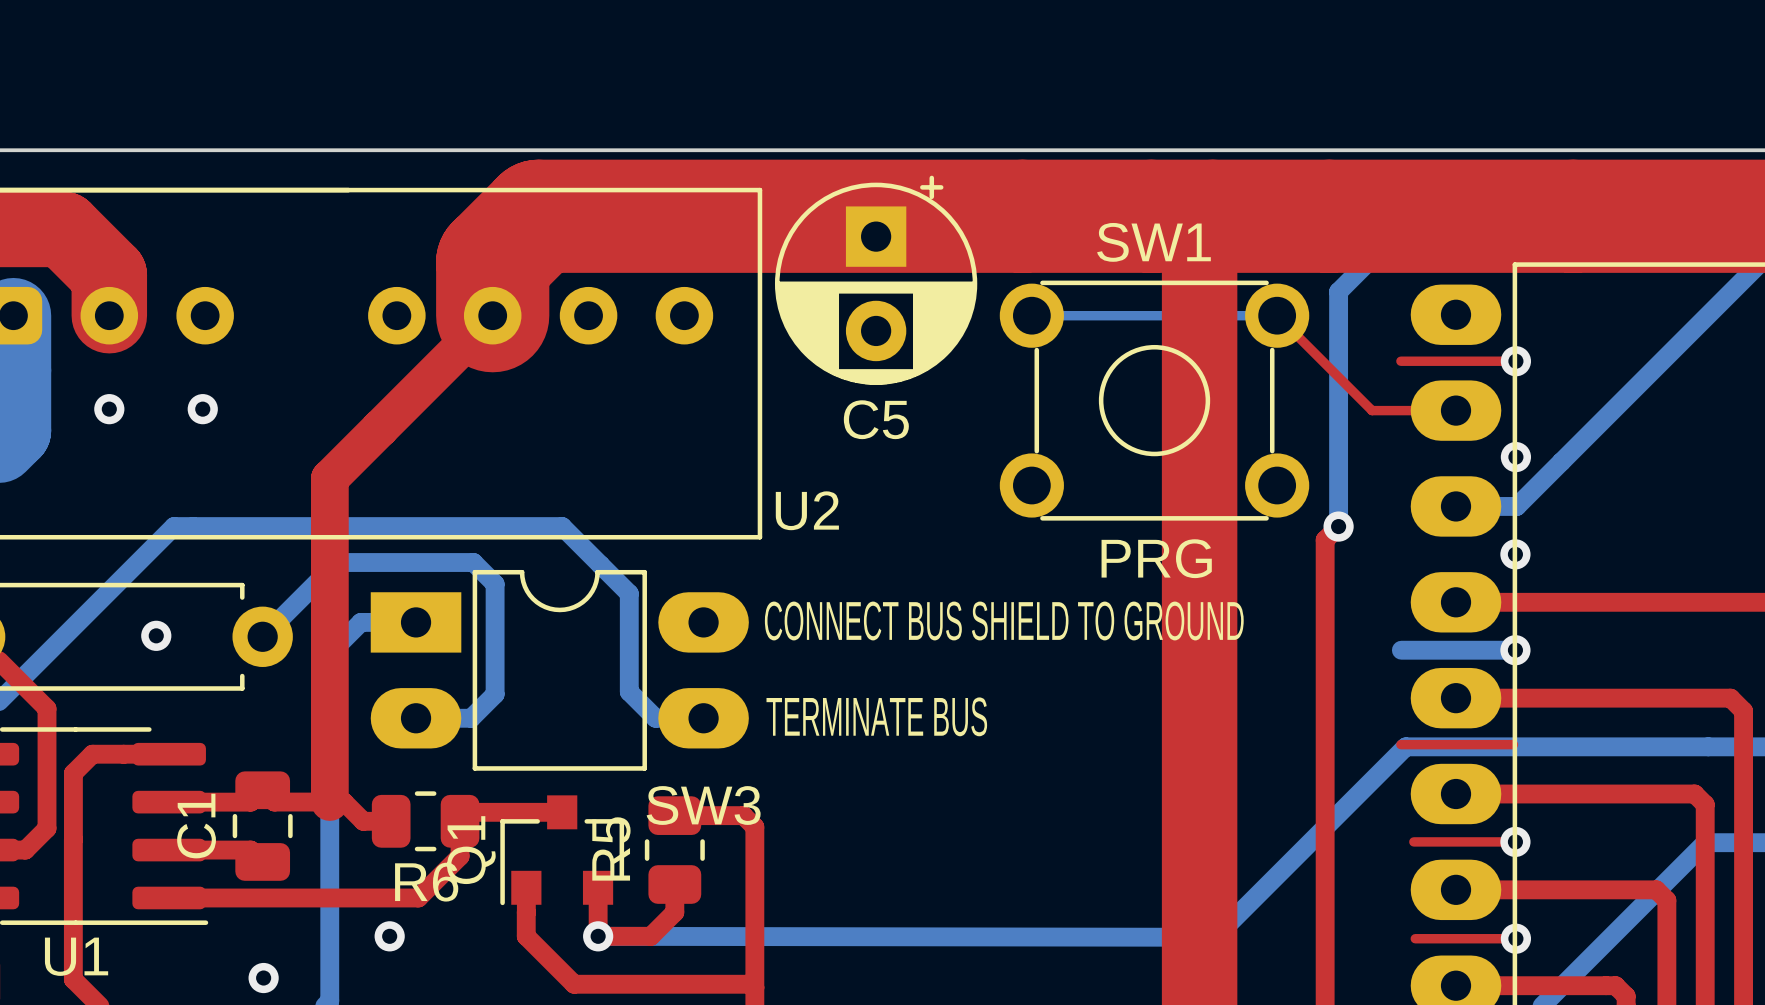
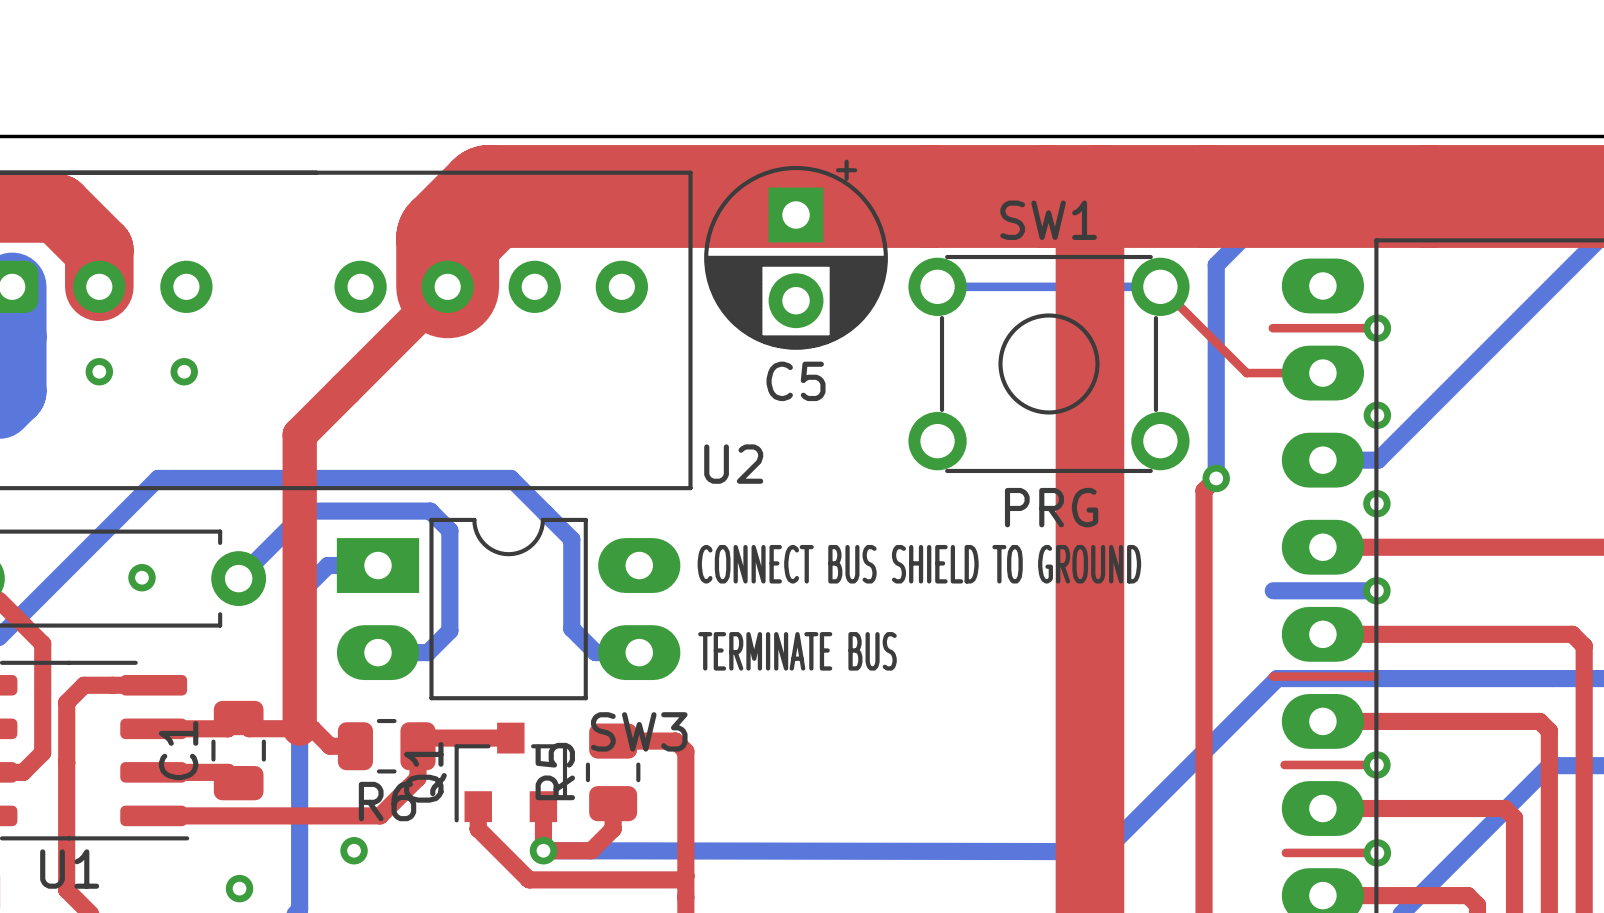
top track: (526, 912) (526, 936) (574, 984) (751, 984) (754, 987) -> (478, 829) (528, 879)
top track: none -> (685, 876) (681, 879) (528, 879)

